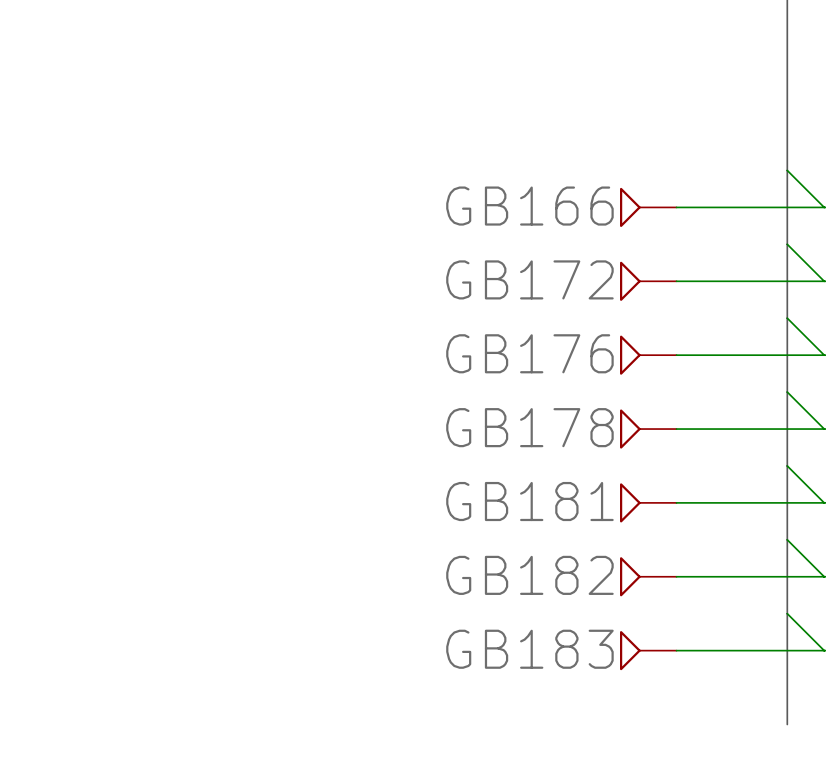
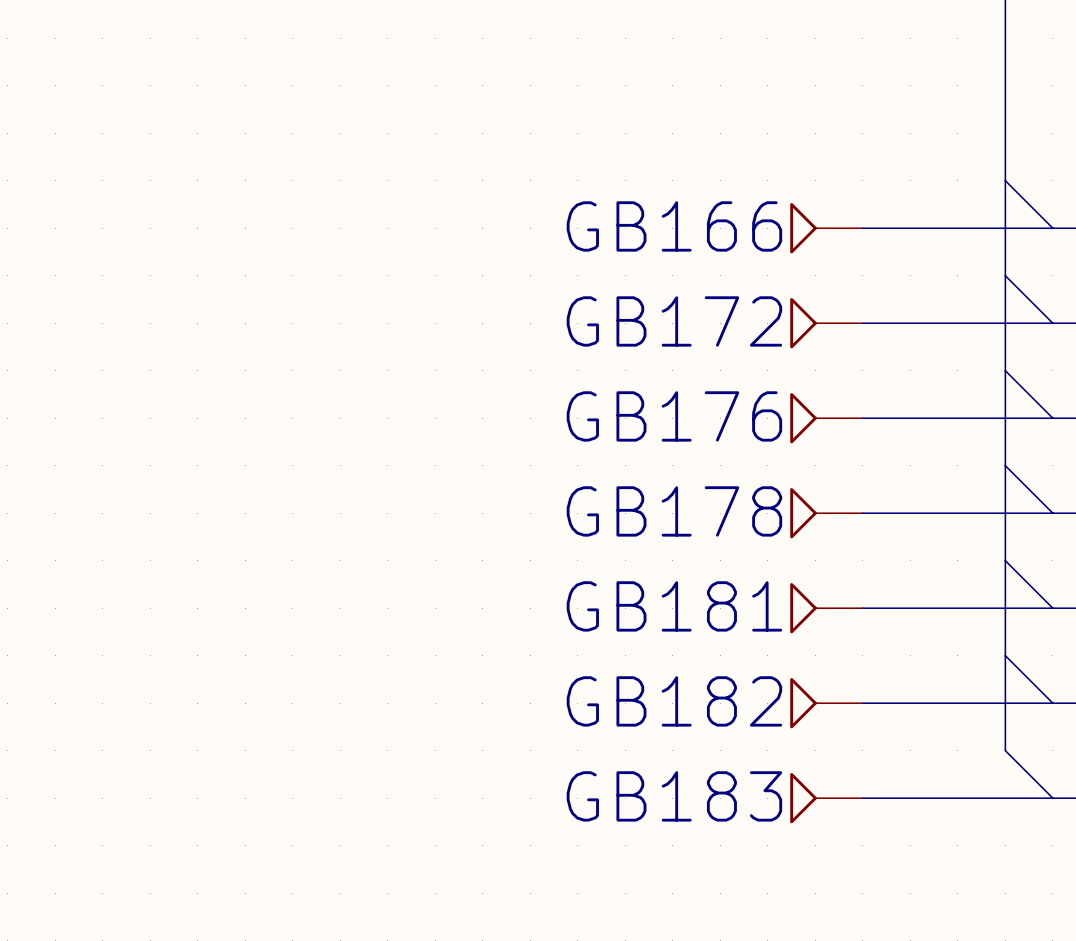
bus: (787, 613) (787, 724) -> none

